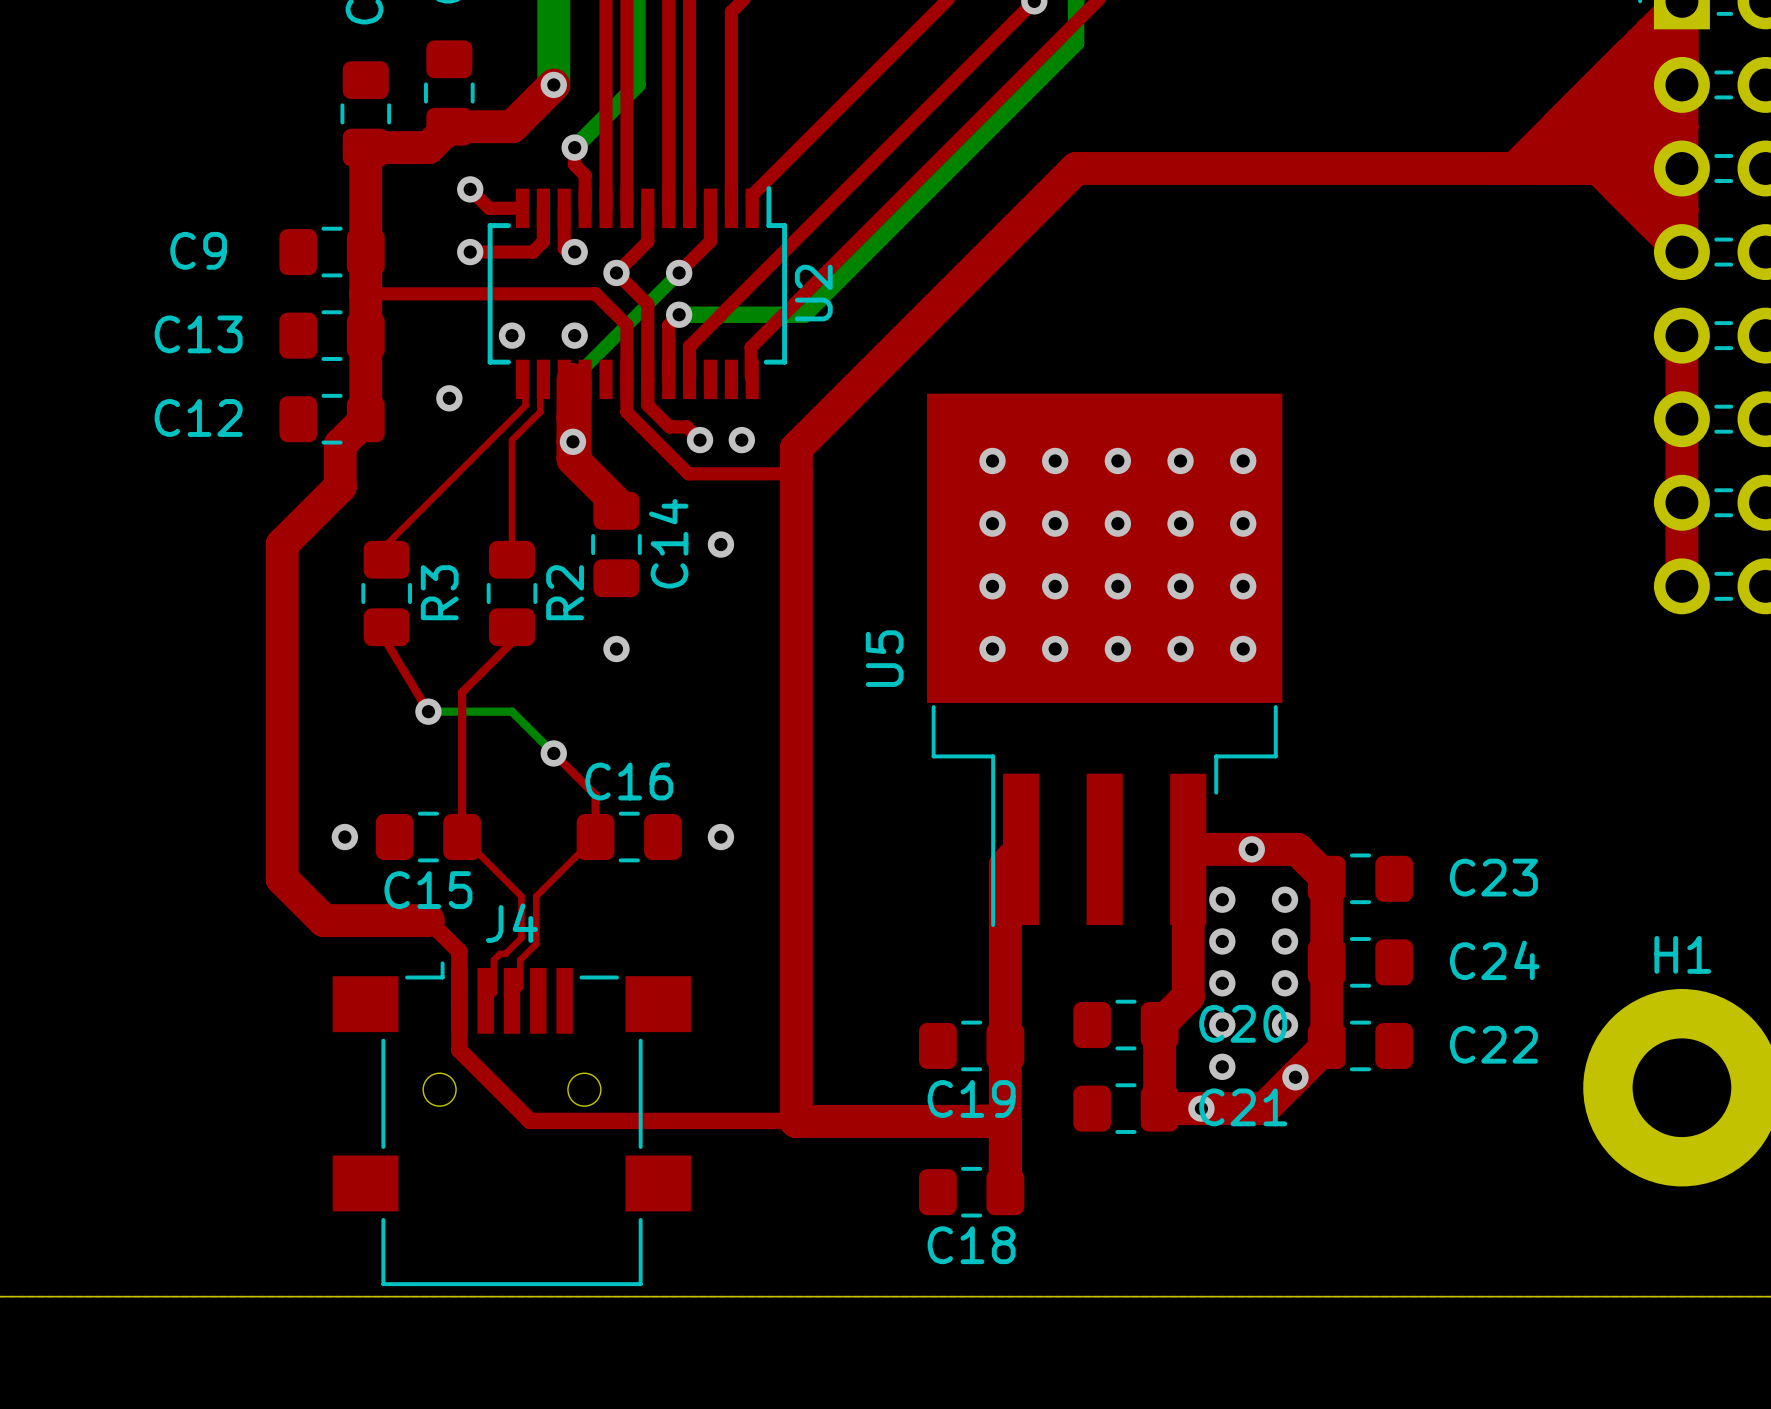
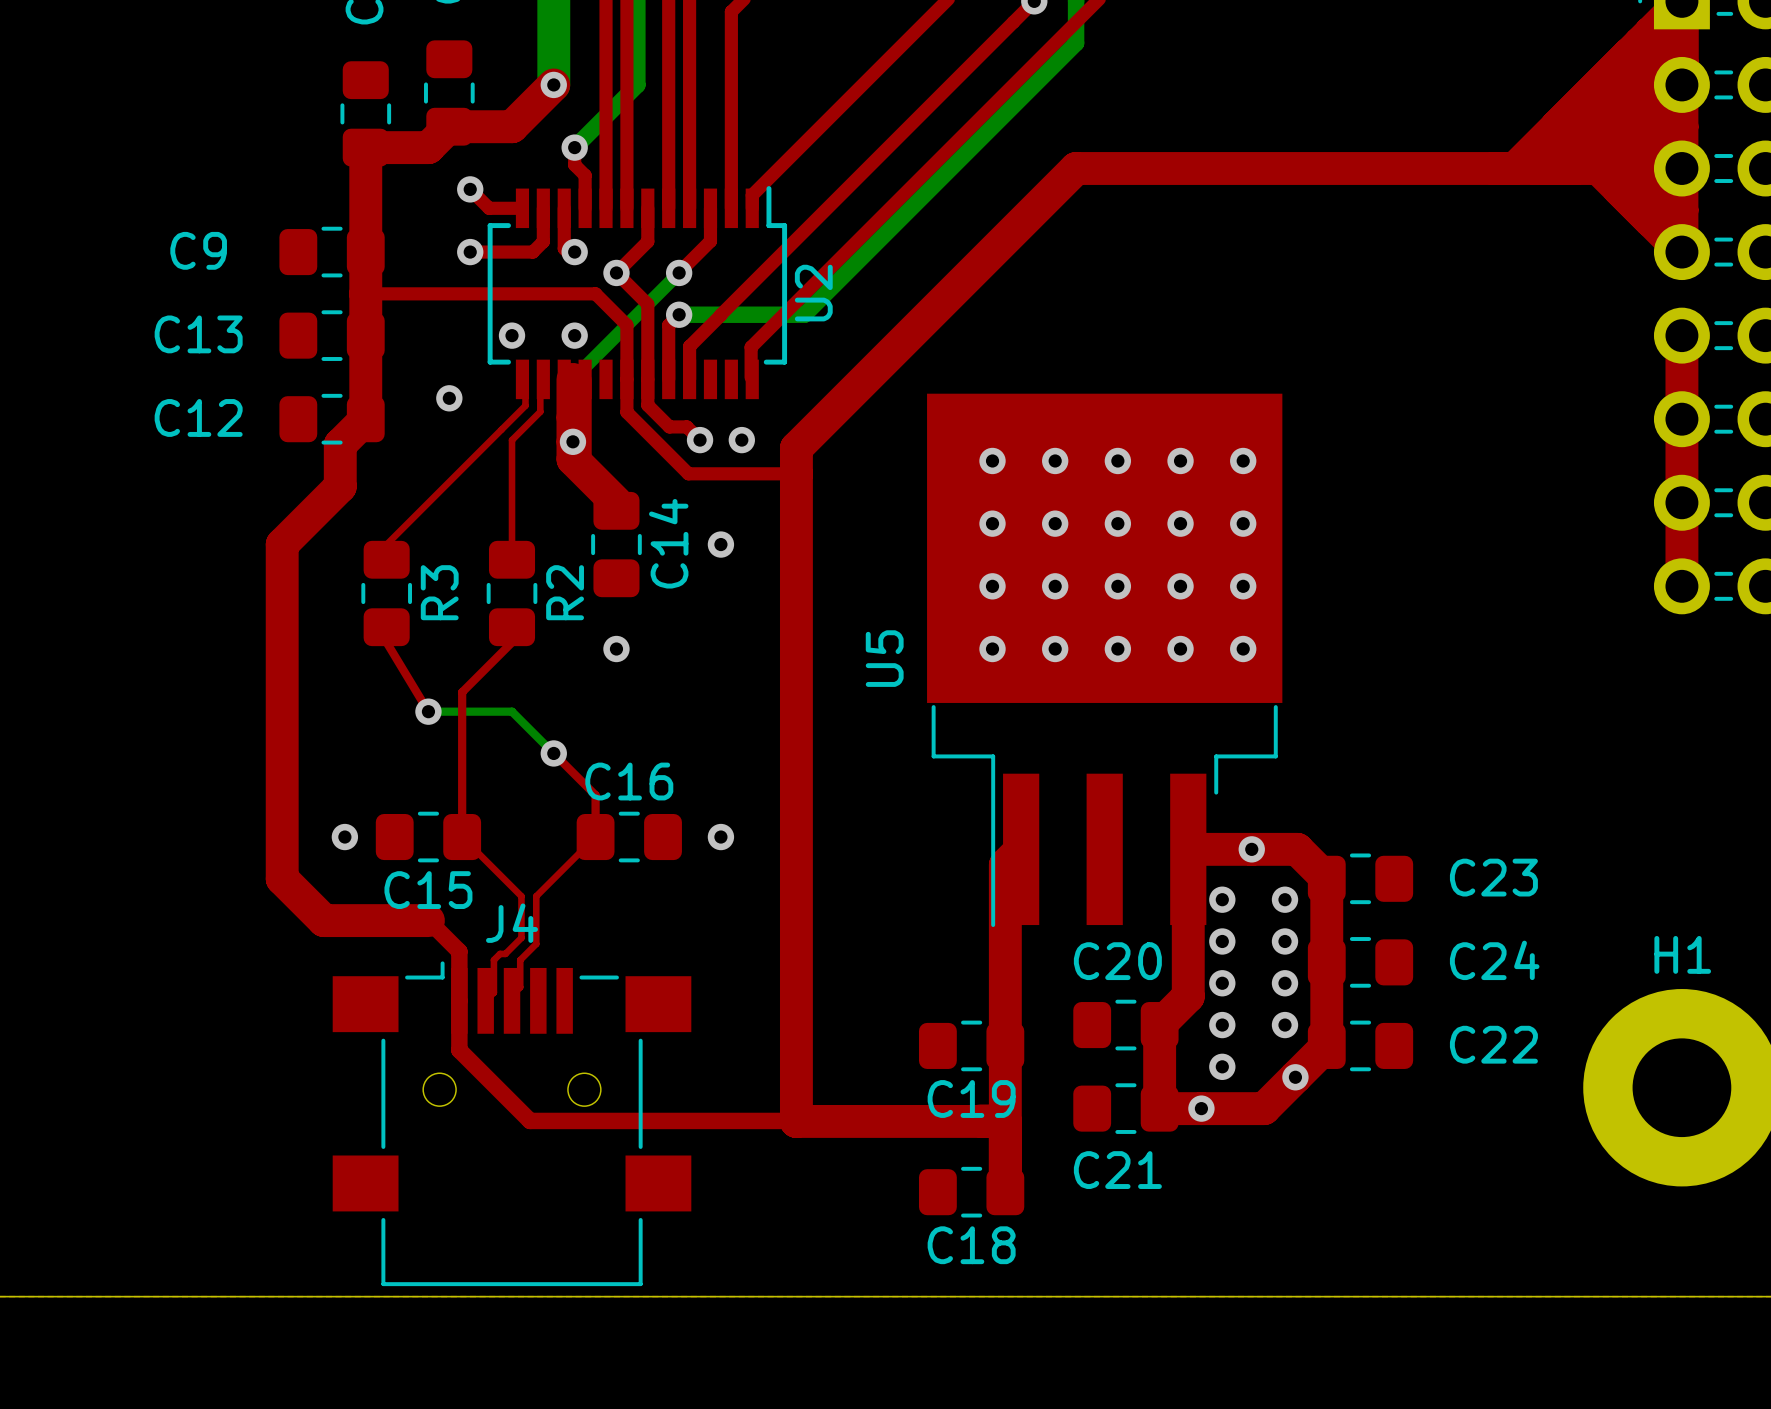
C20 name position: C20 (1243, 1023) -> C20 (1117, 961)
C21 name position: C21 (1243, 1107) -> C21 (1117, 1170)

